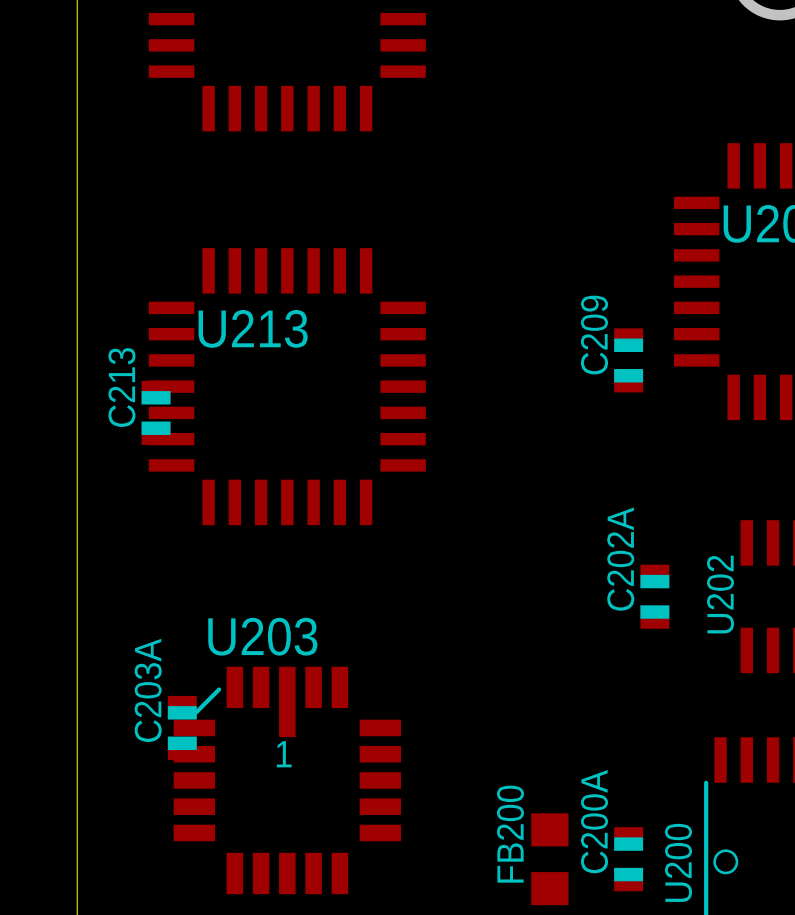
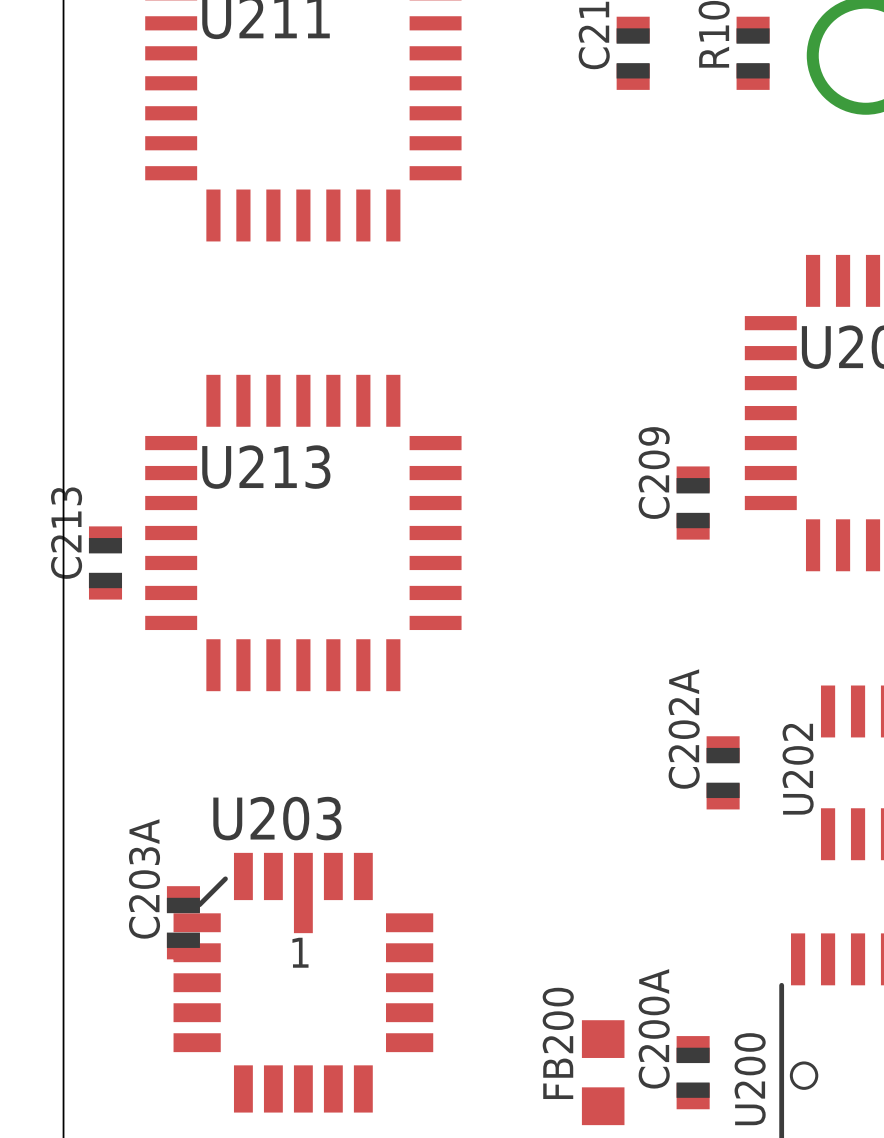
C213 position: (156, 412) -> (105, 562)

